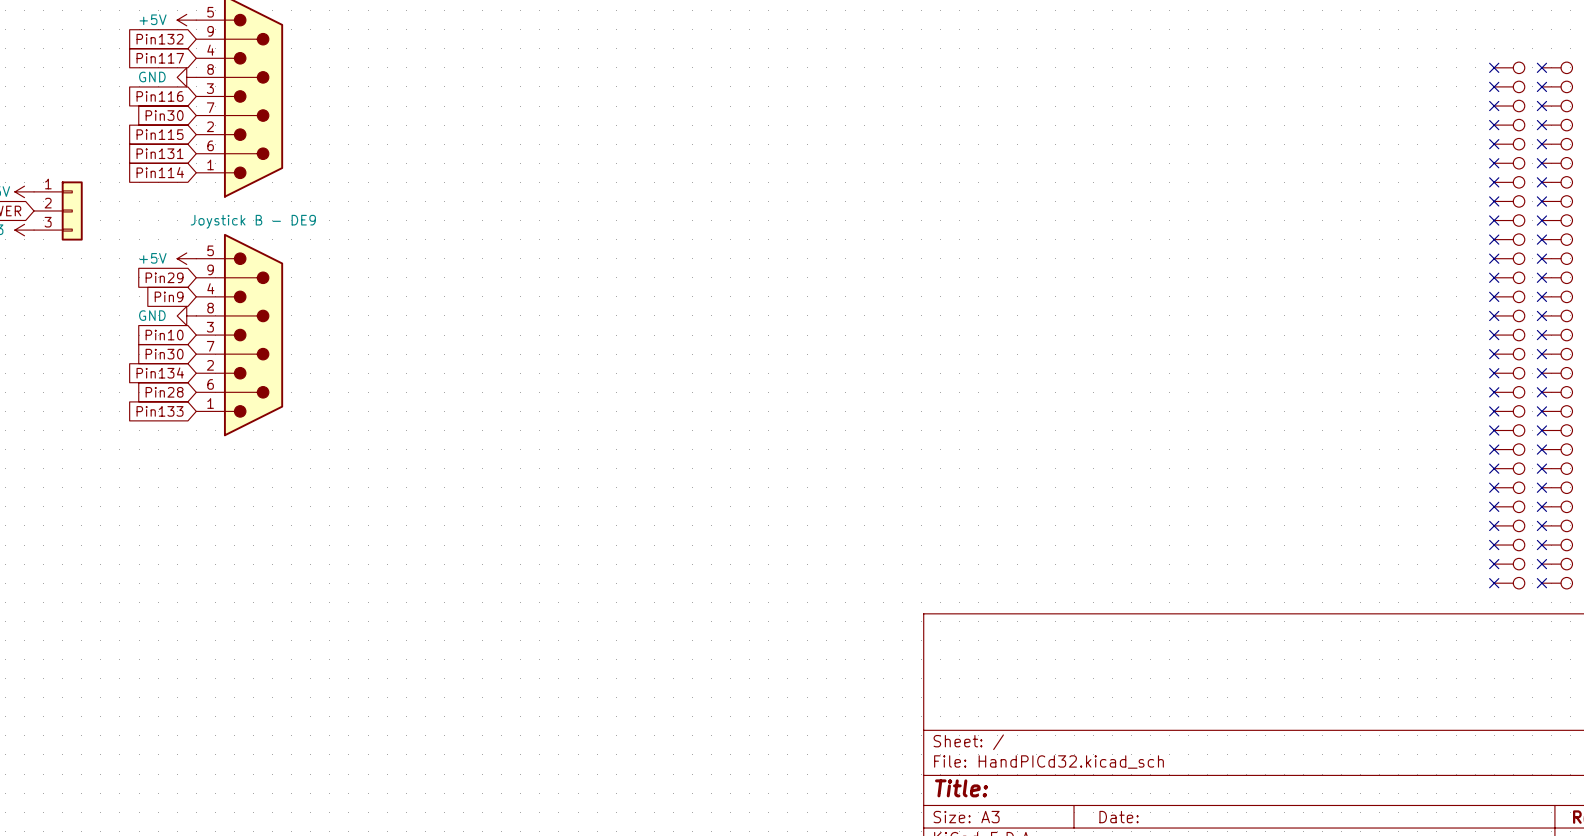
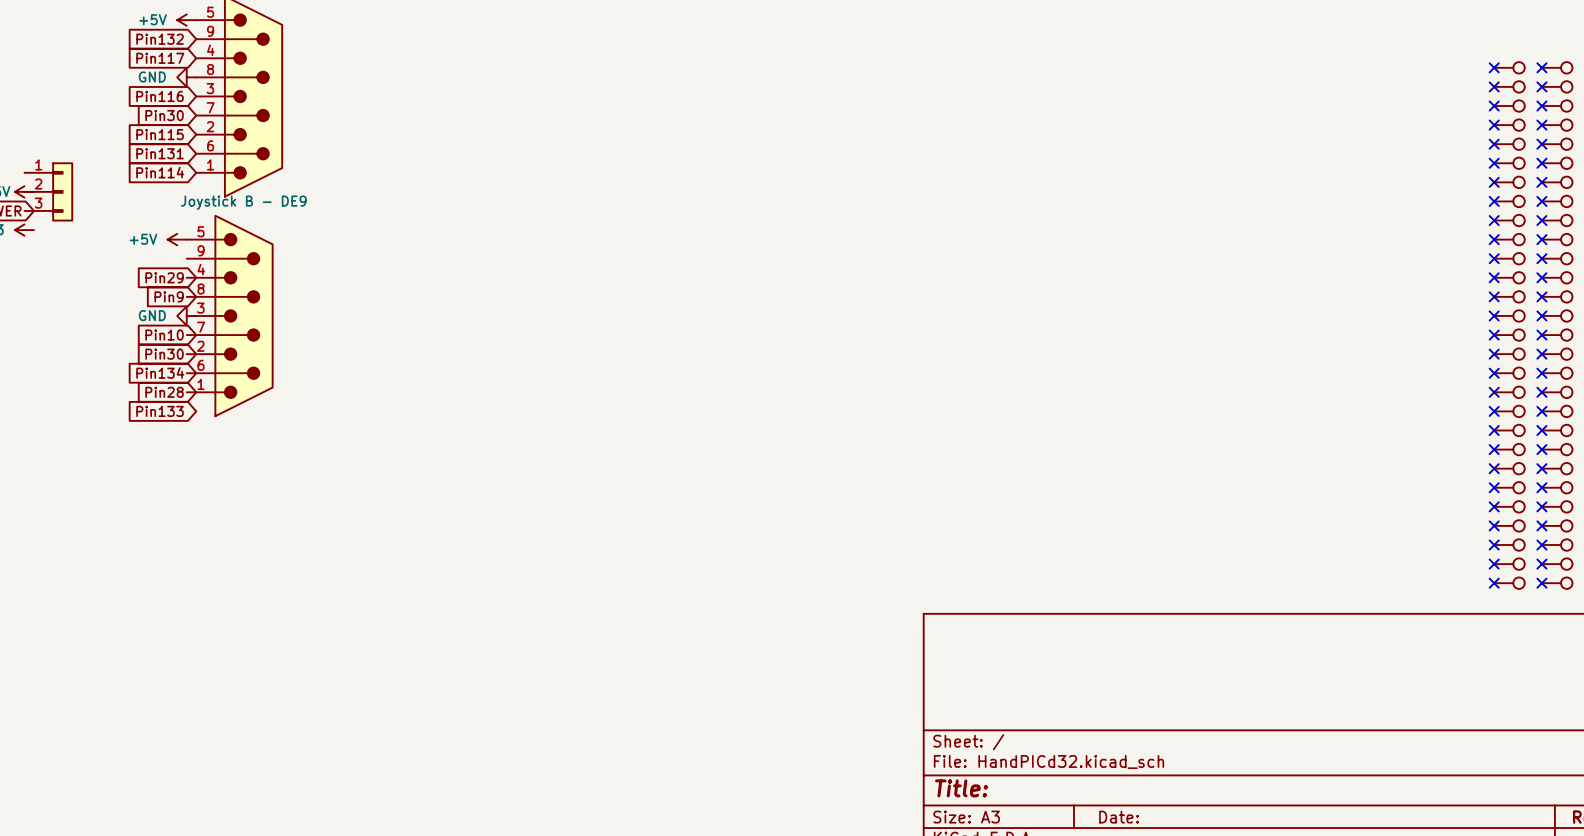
part position: (58, 210) -> (48, 191)
power symbol position: +5V (186, 258) -> +5V (177, 239)
part position: (239, 335) -> (230, 315)

